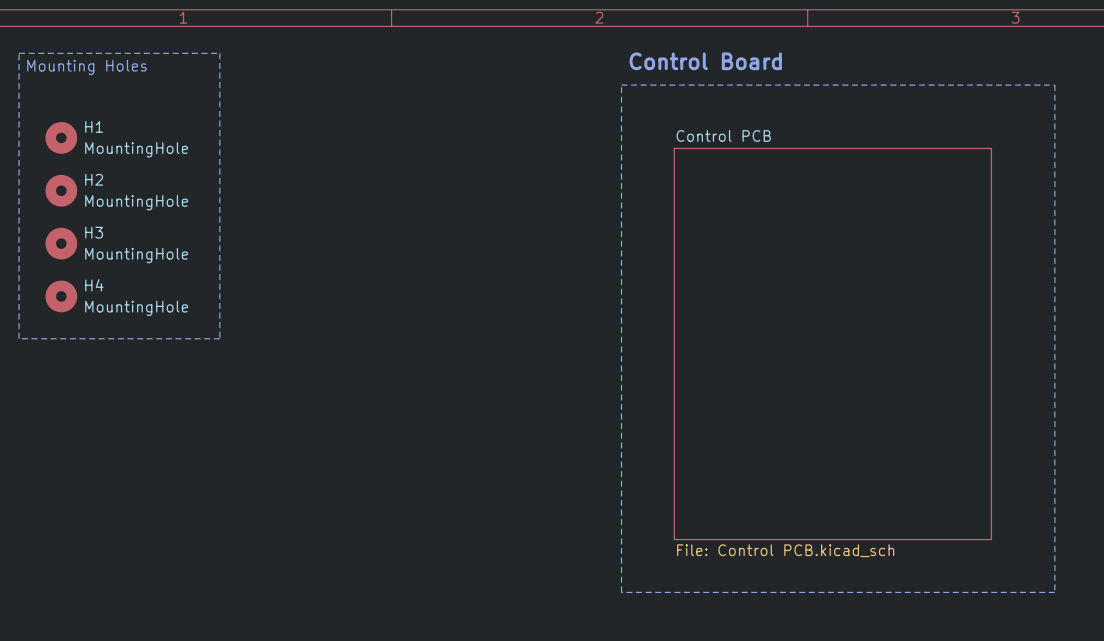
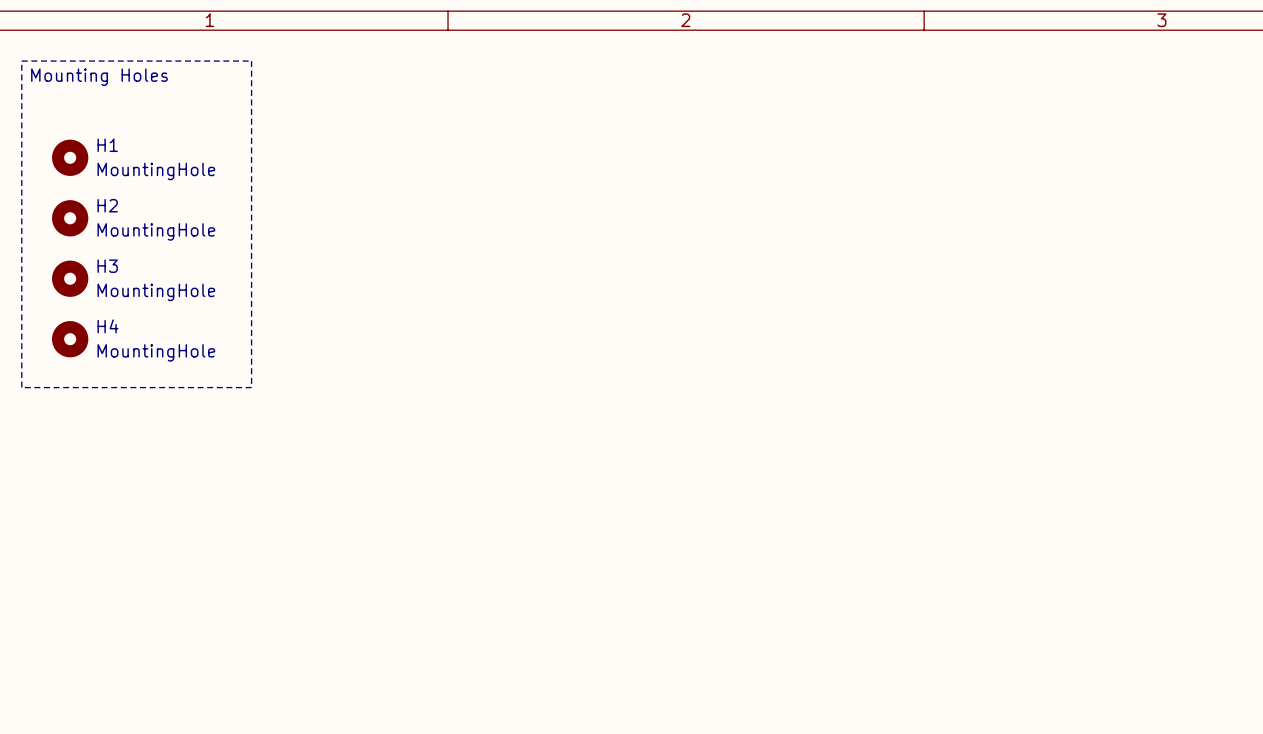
text: Control Board (705, 61) -> none
line: (621, 85) (1054, 85) (1054, 592) (621, 592) (621, 85) -> none
sheet Control PCB: File: Control PCB.kicad_sch (832, 344) -> none

